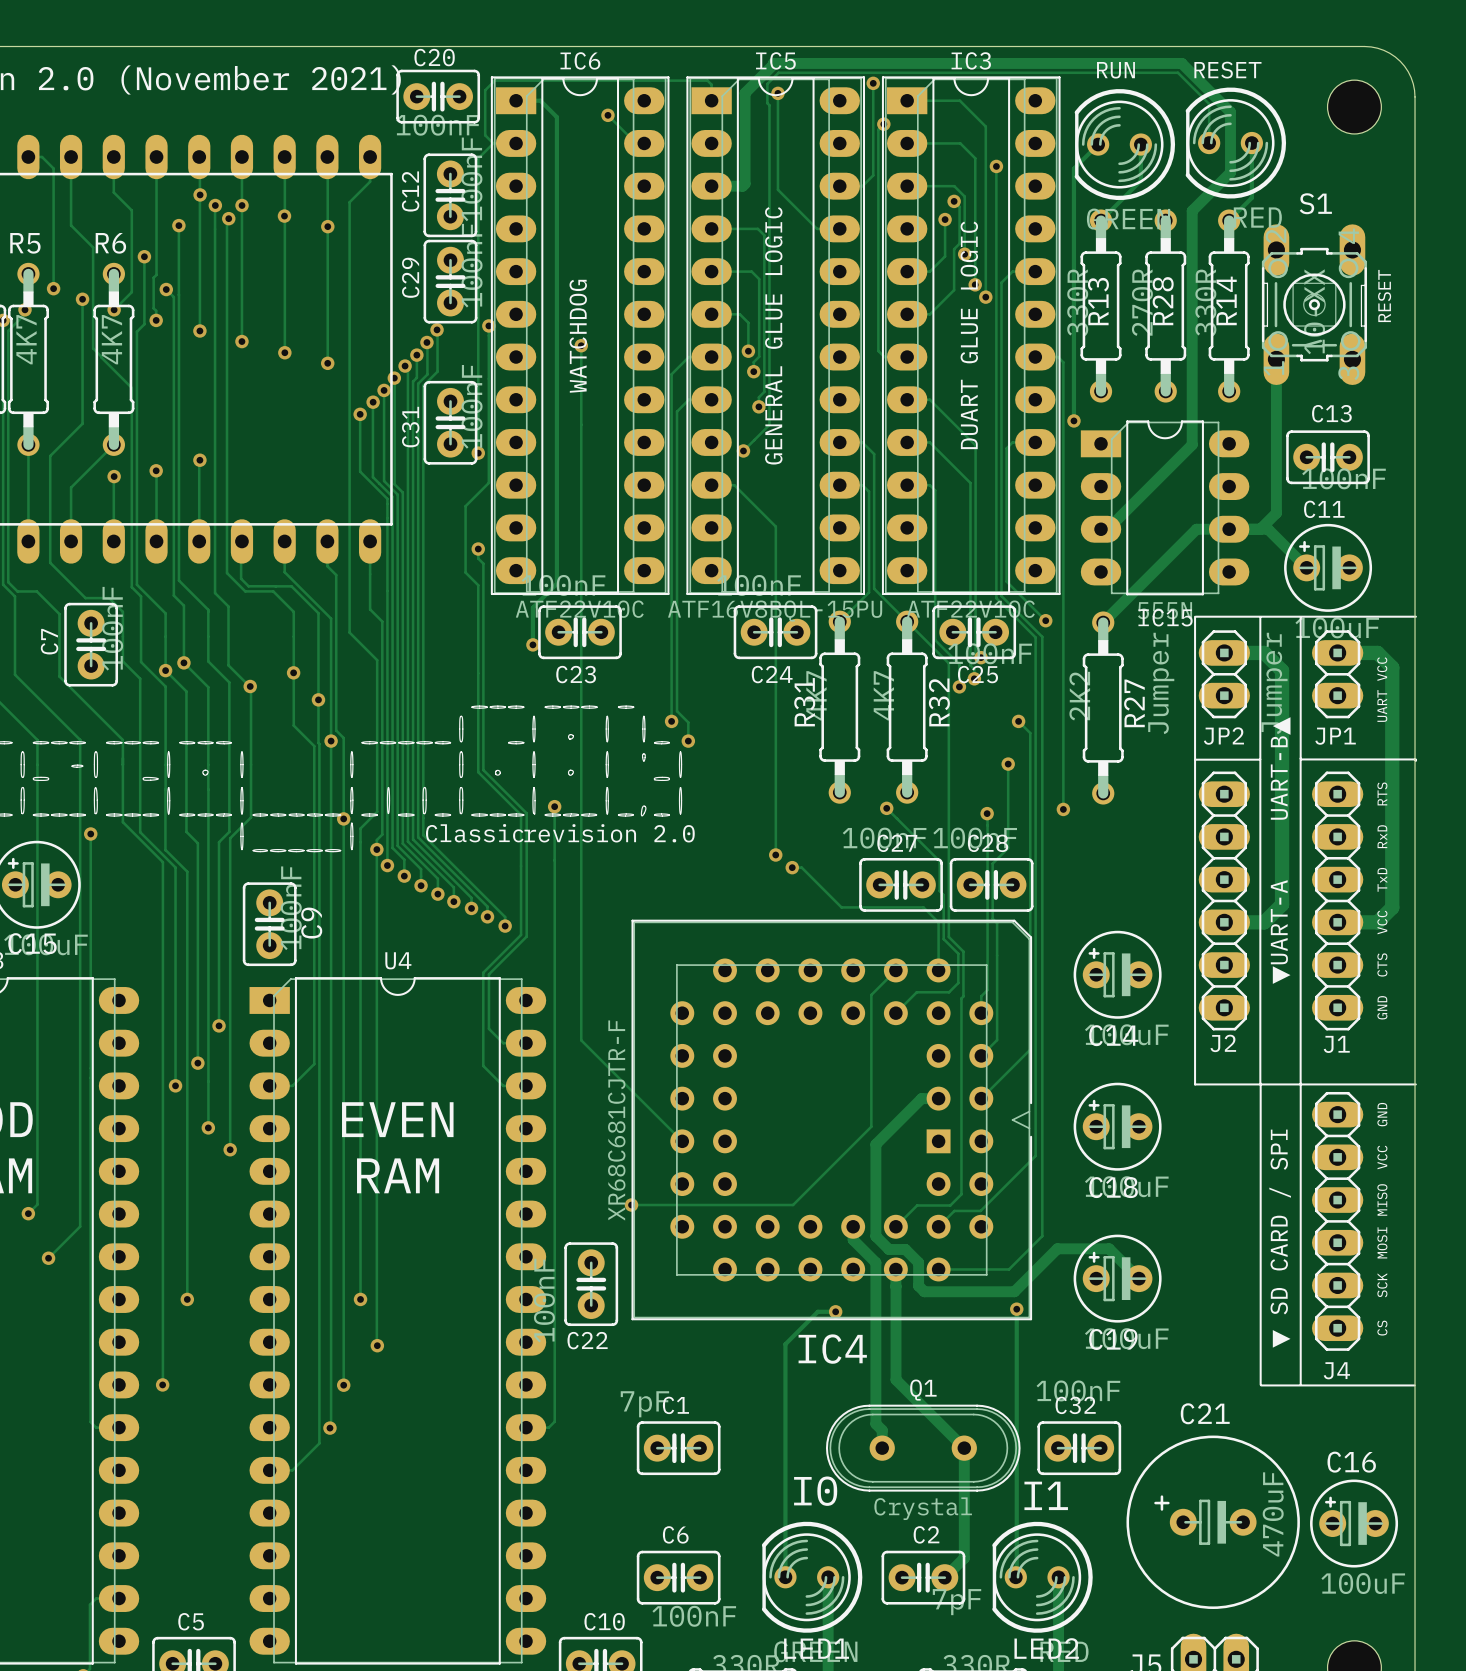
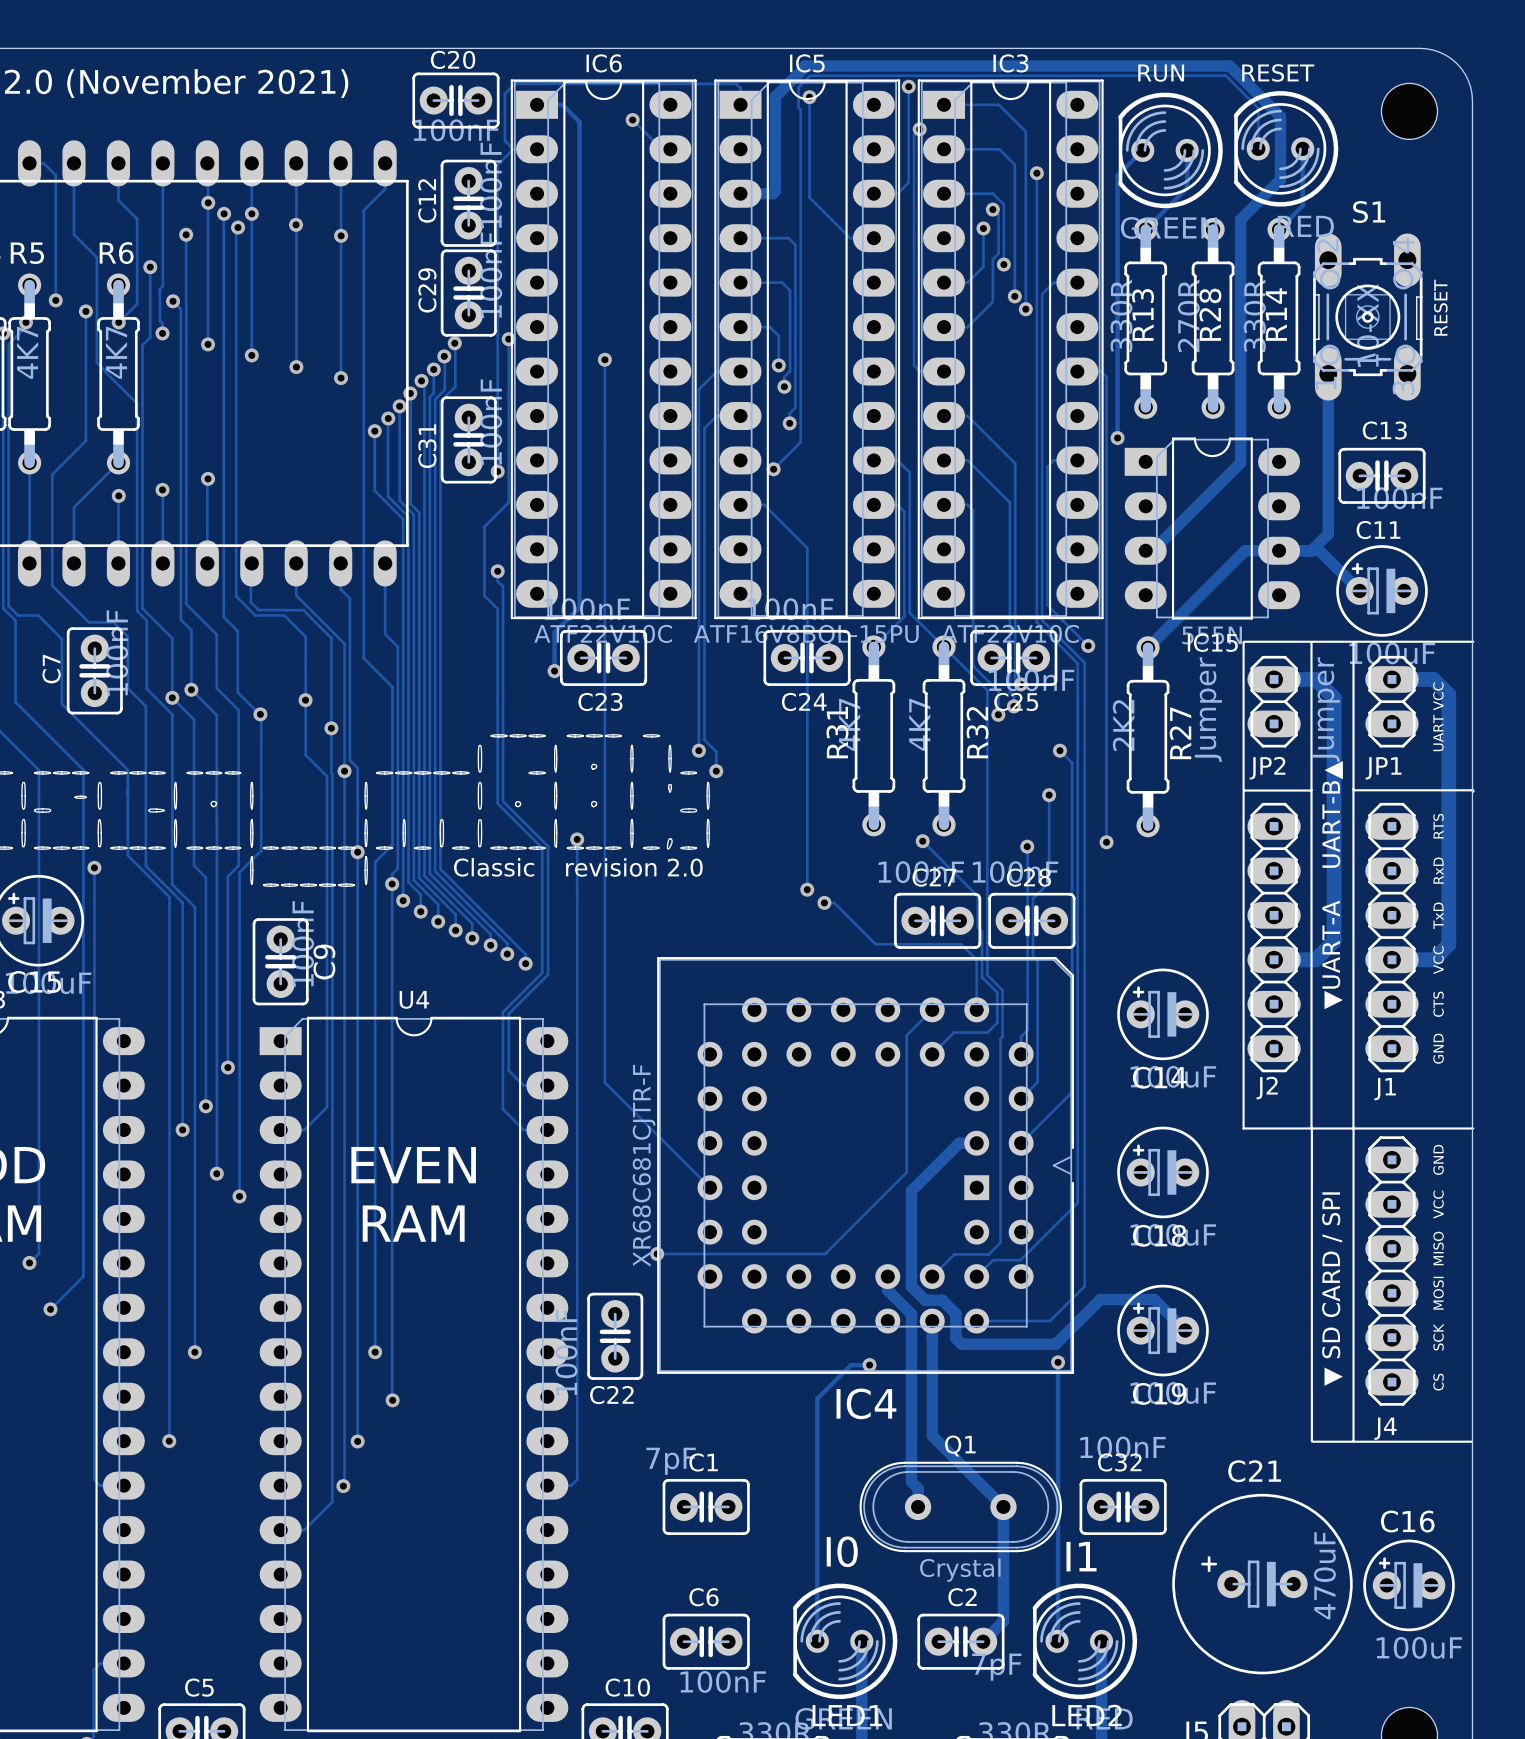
text: GENERAL GLUE LOGIC (773, 335) -> none
text: DUART GLUE LOGIC (969, 335) -> none
text: WATCHDOG (578, 336) -> none

